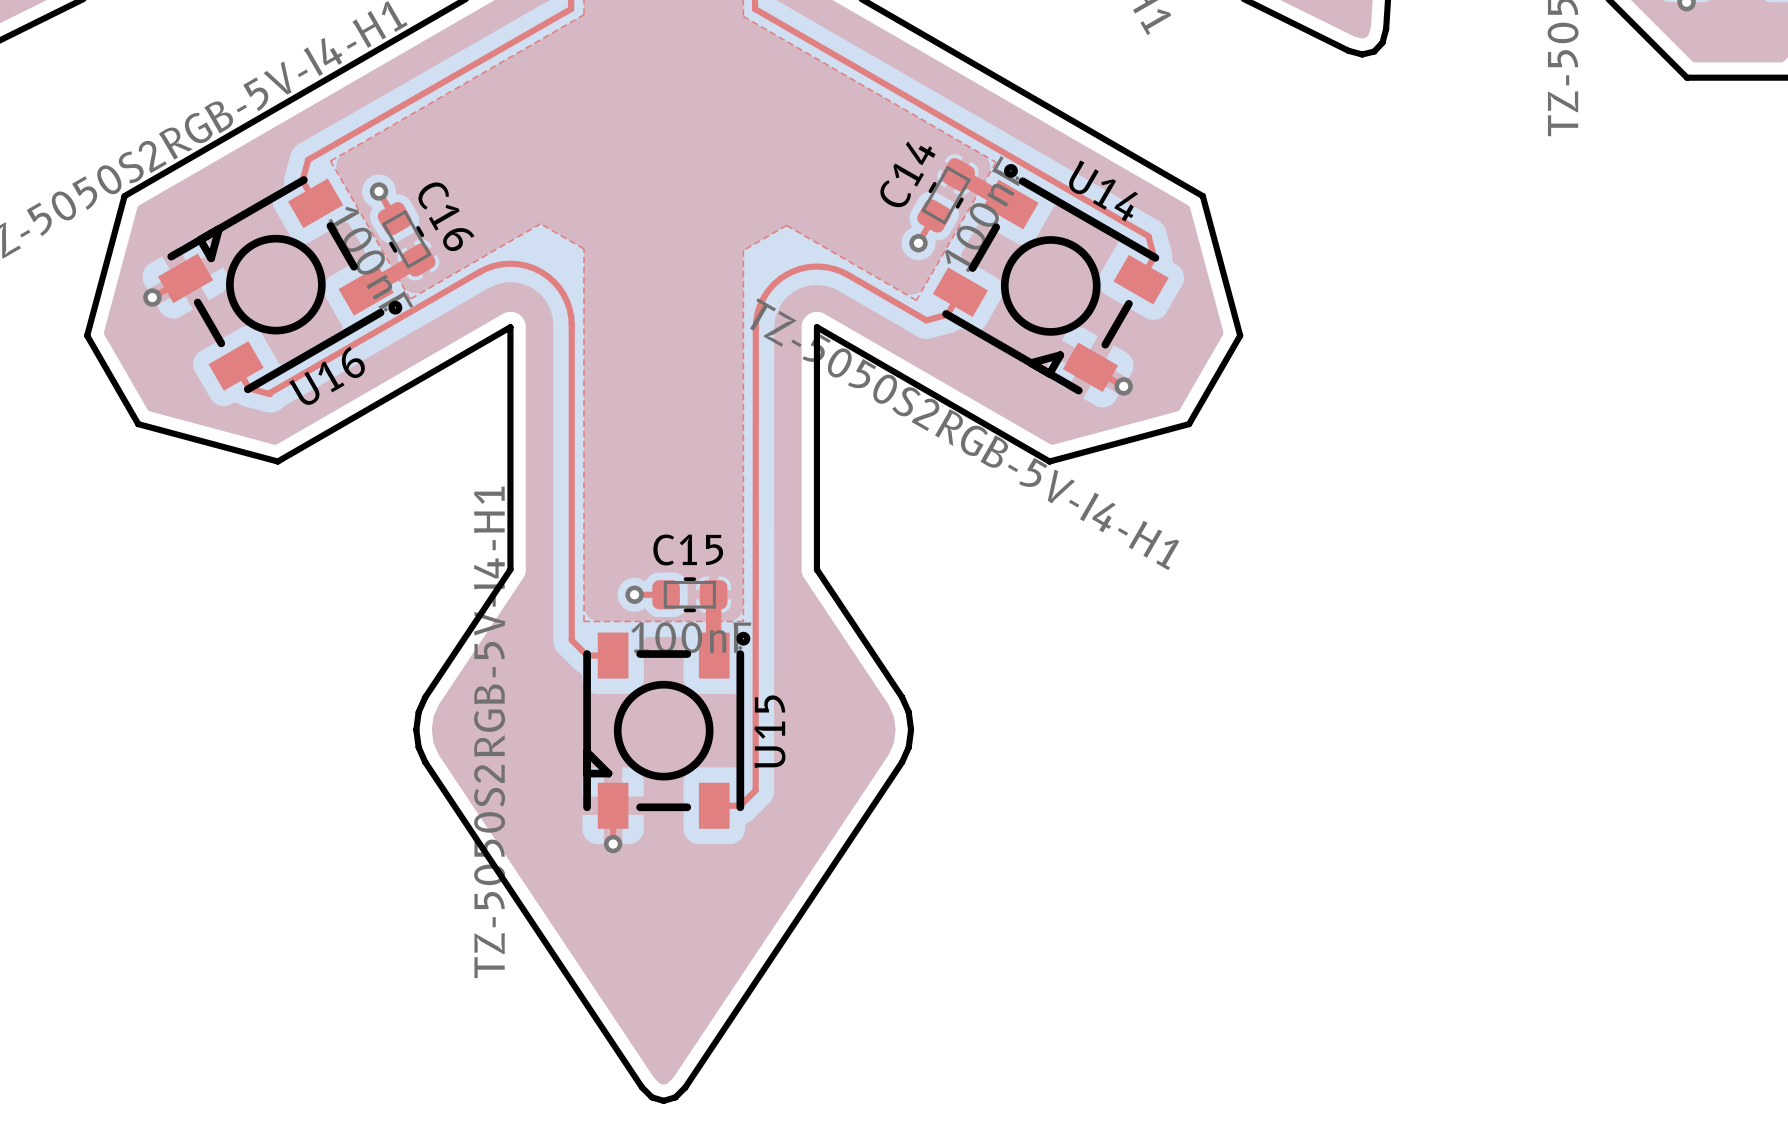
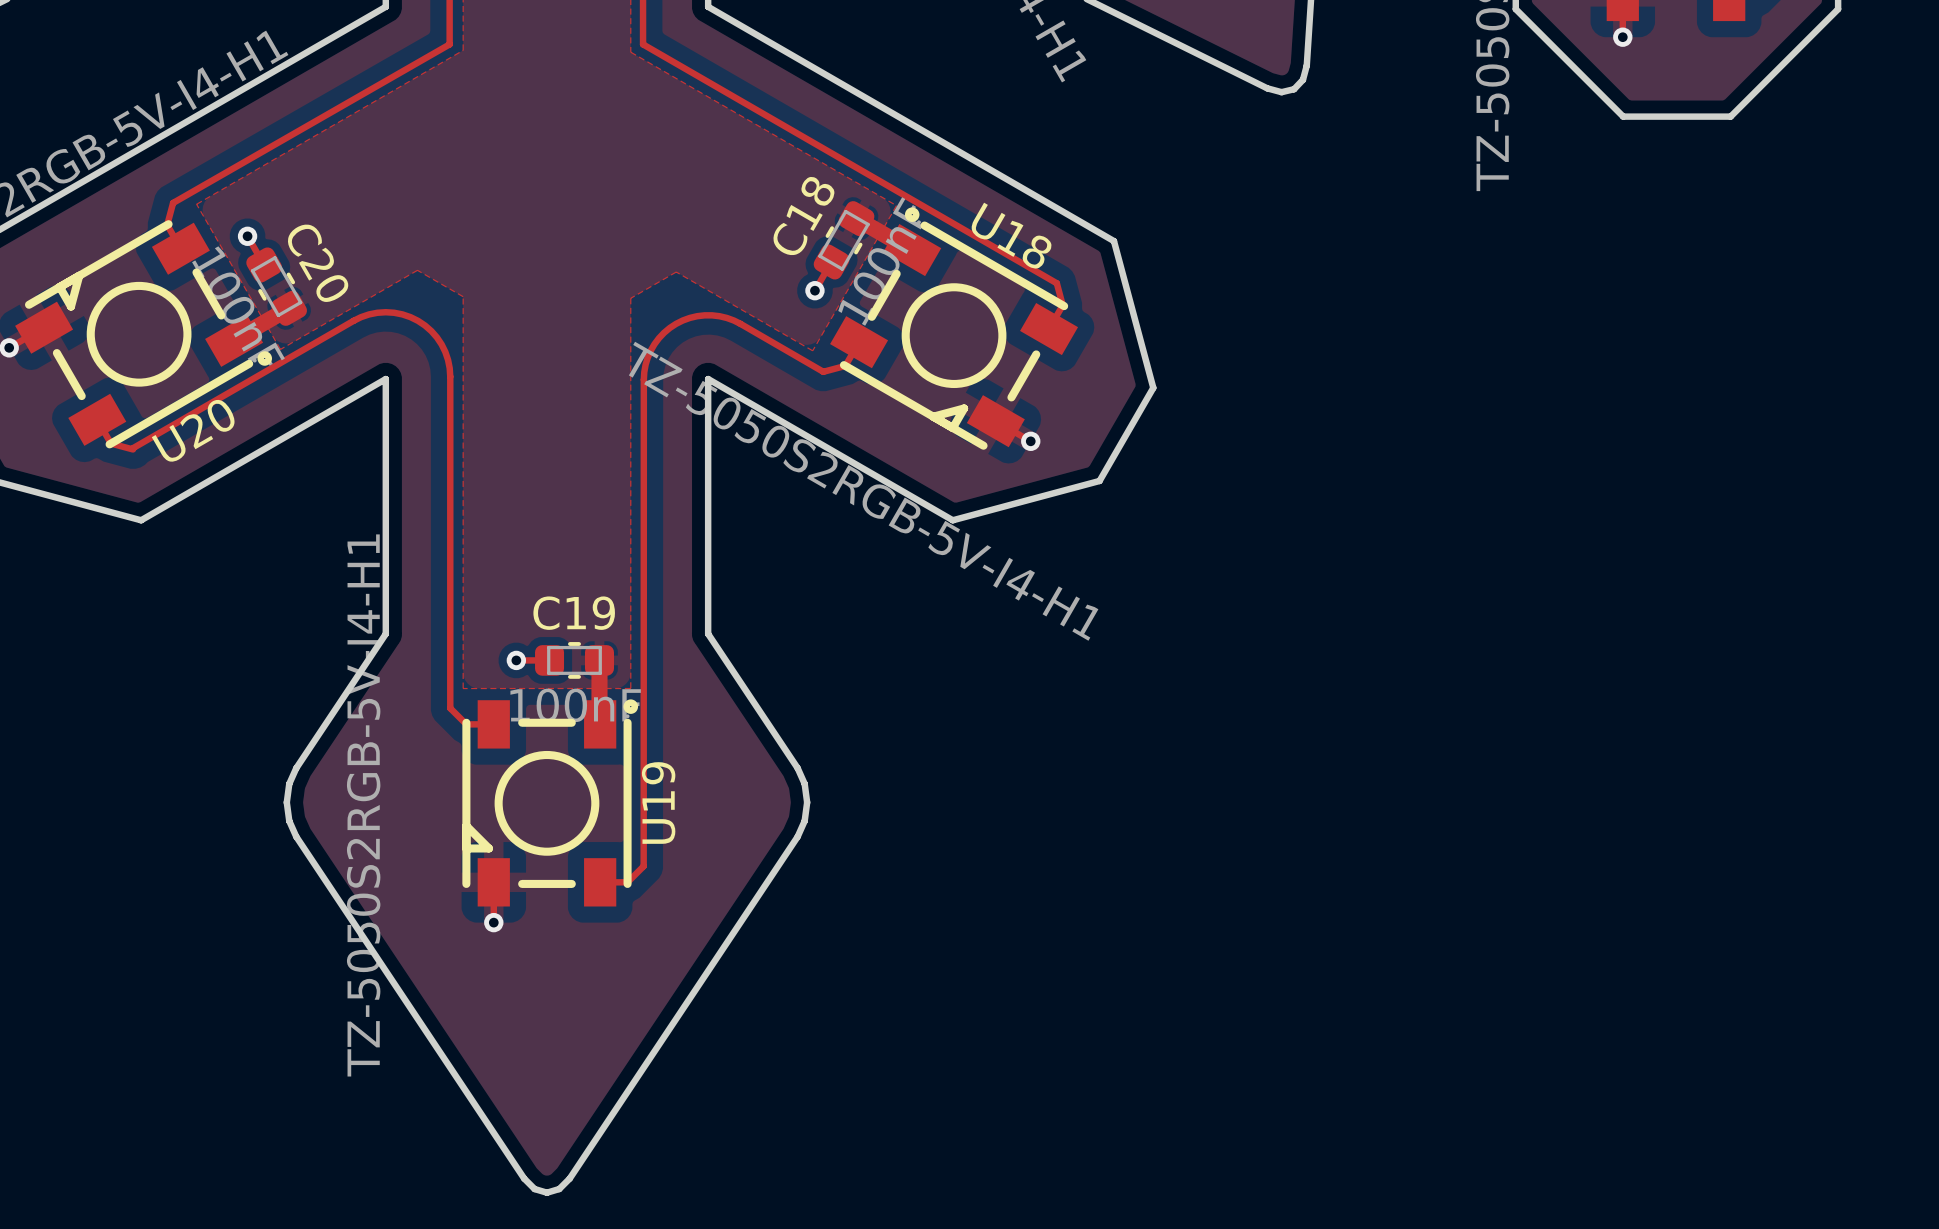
C14 name: C14 (907, 174) -> C18 (803, 216)
U14 name: U14 (1103, 190) -> U18 (1011, 235)
C16 name: C16 (446, 216) -> C20 (318, 262)
U16 name: U16 (327, 375) -> U20 (193, 430)
C15 name: C15 (688, 549) -> C19 (574, 613)
U15 name: U15 (769, 731) -> U19 (658, 802)

